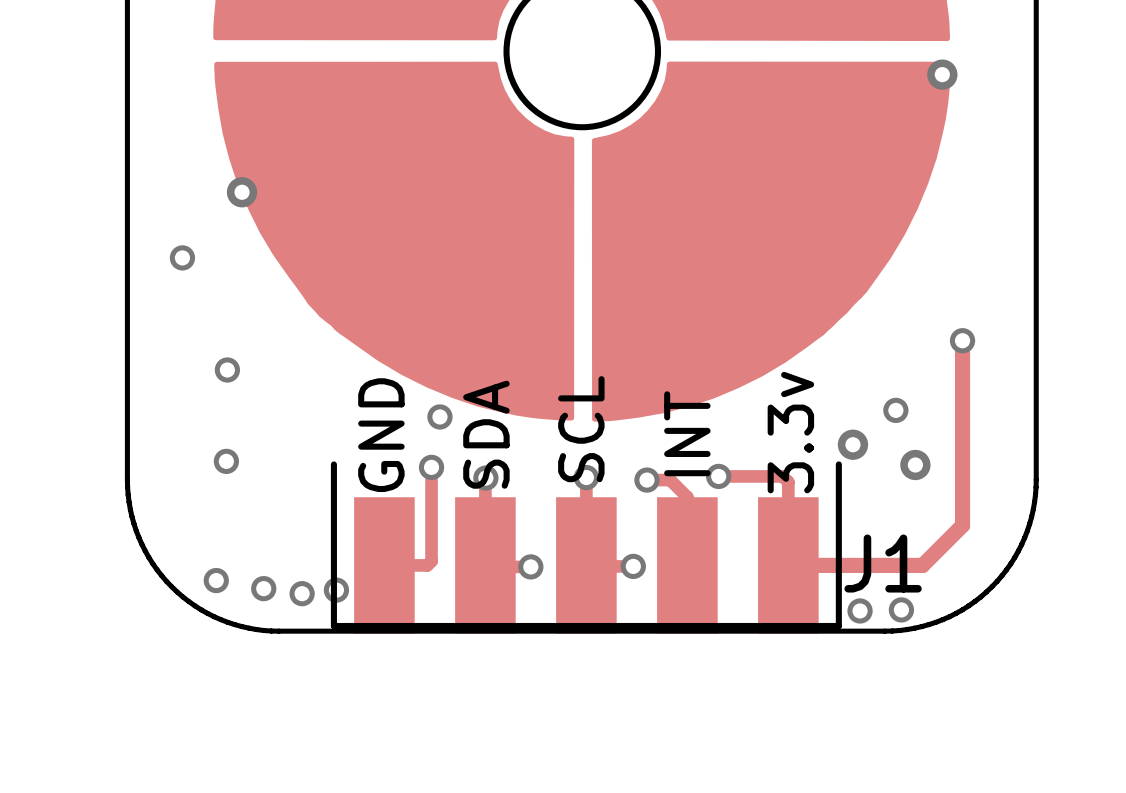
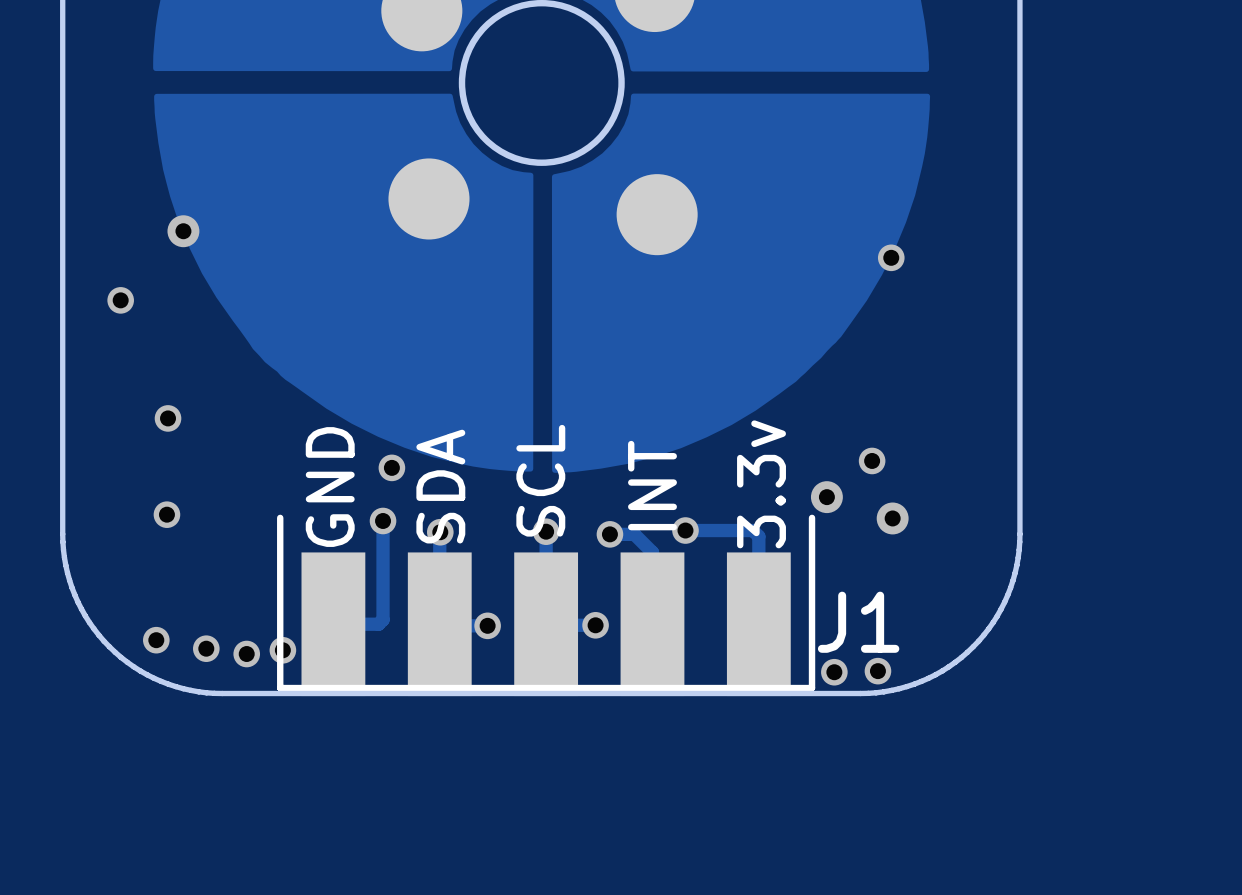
via: (942, 74) -> none
track: (962, 340) (962, 525) (922, 565) (788, 565) -> none
via position: (962, 340) -> (891, 257)

